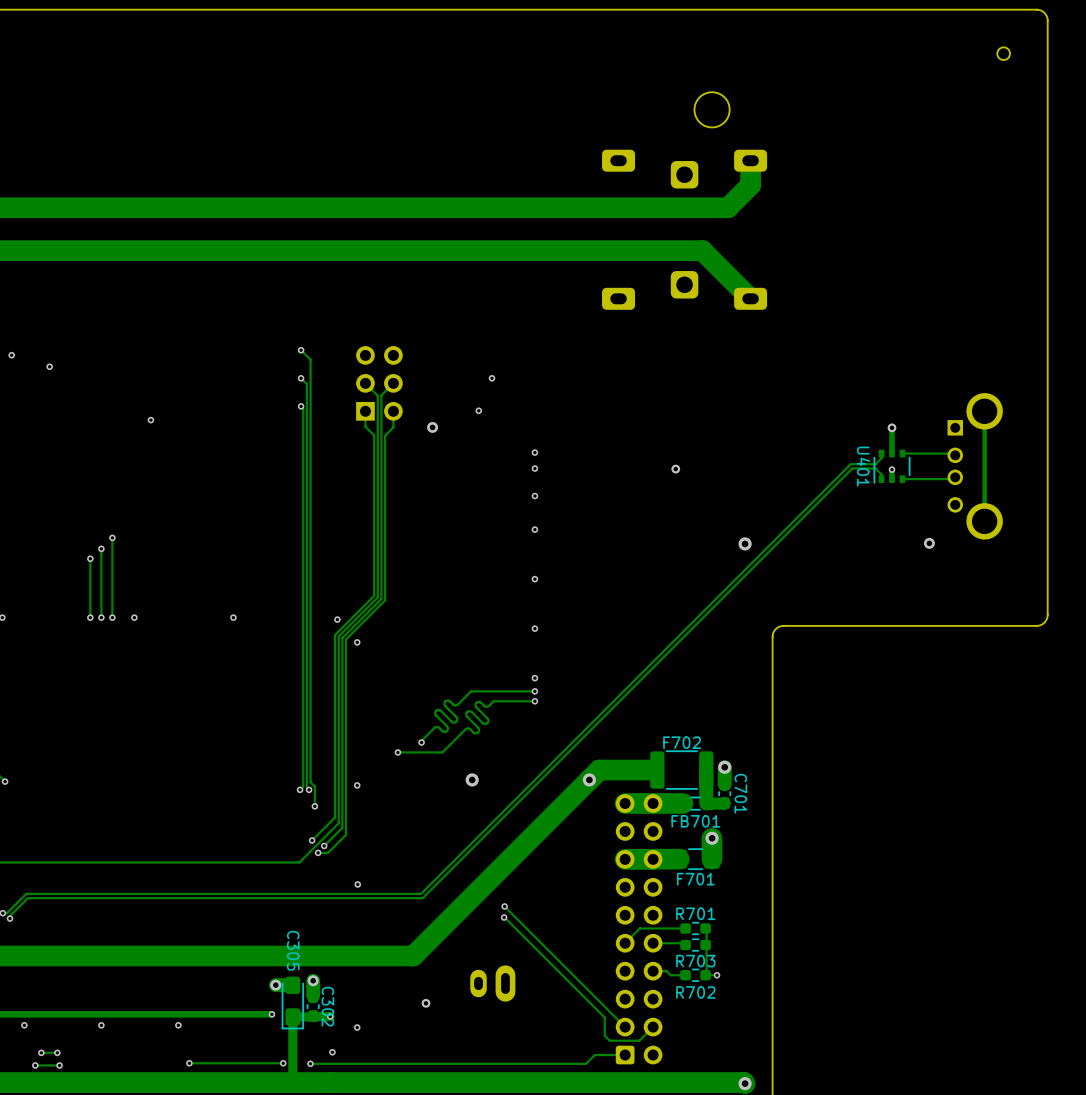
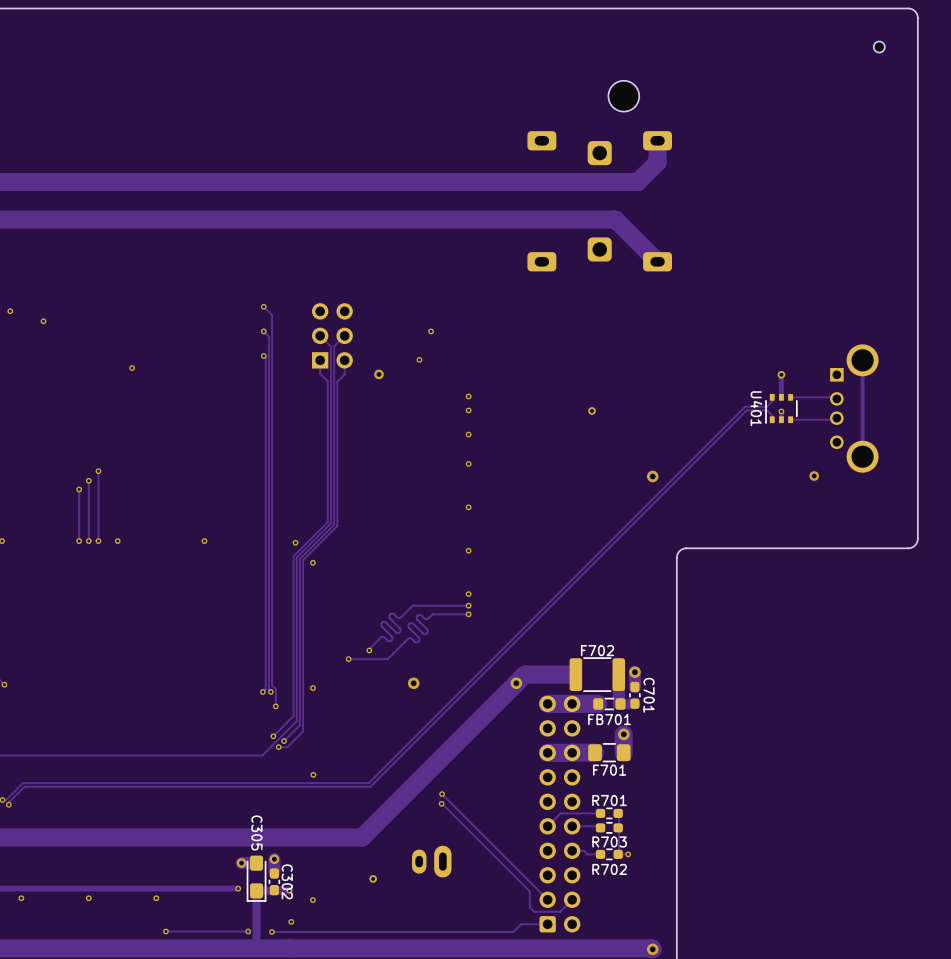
via: (41, 1052) -> none
track: (57, 1052) (41, 1052) -> none
via: (57, 1052) -> none
via: (35, 1065) -> none
track: (59, 1065) (35, 1065) -> none
via: (59, 1065) -> none

